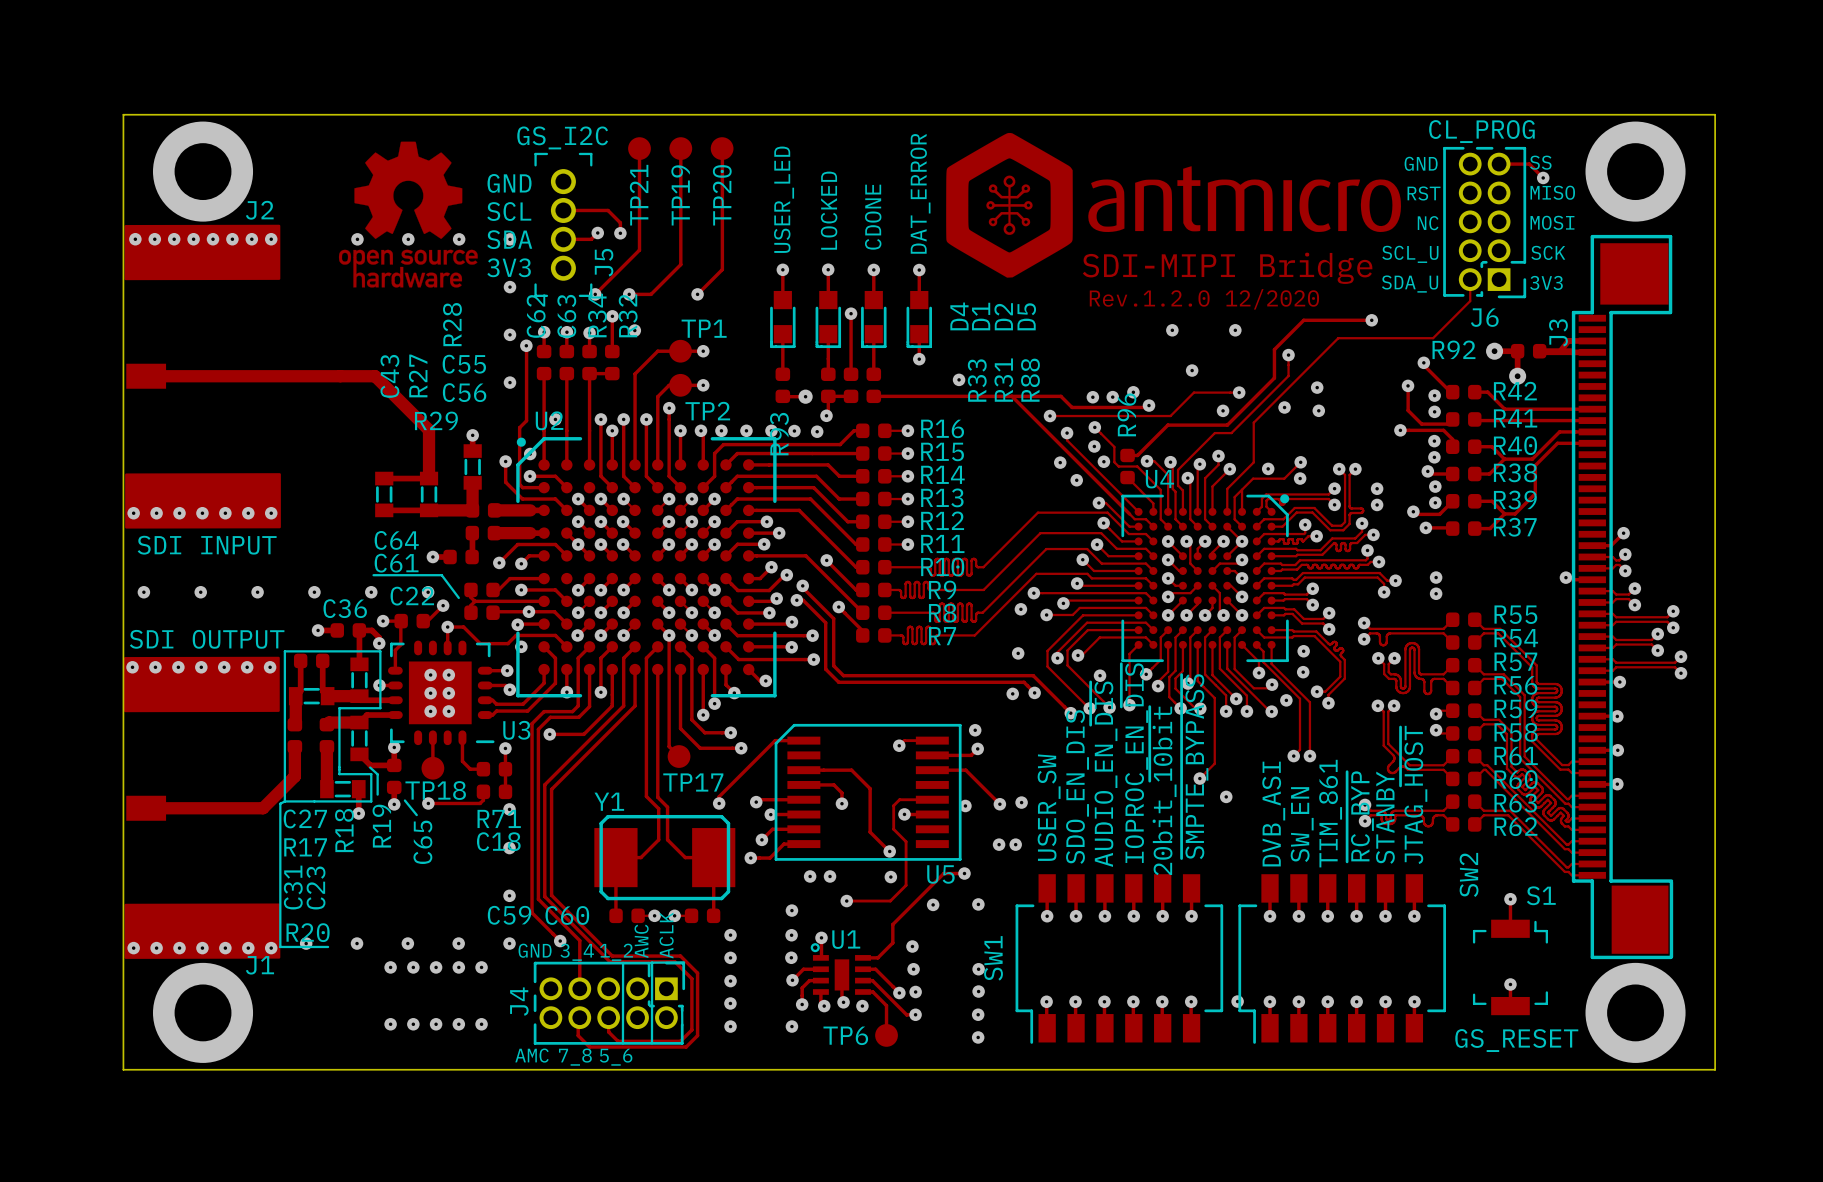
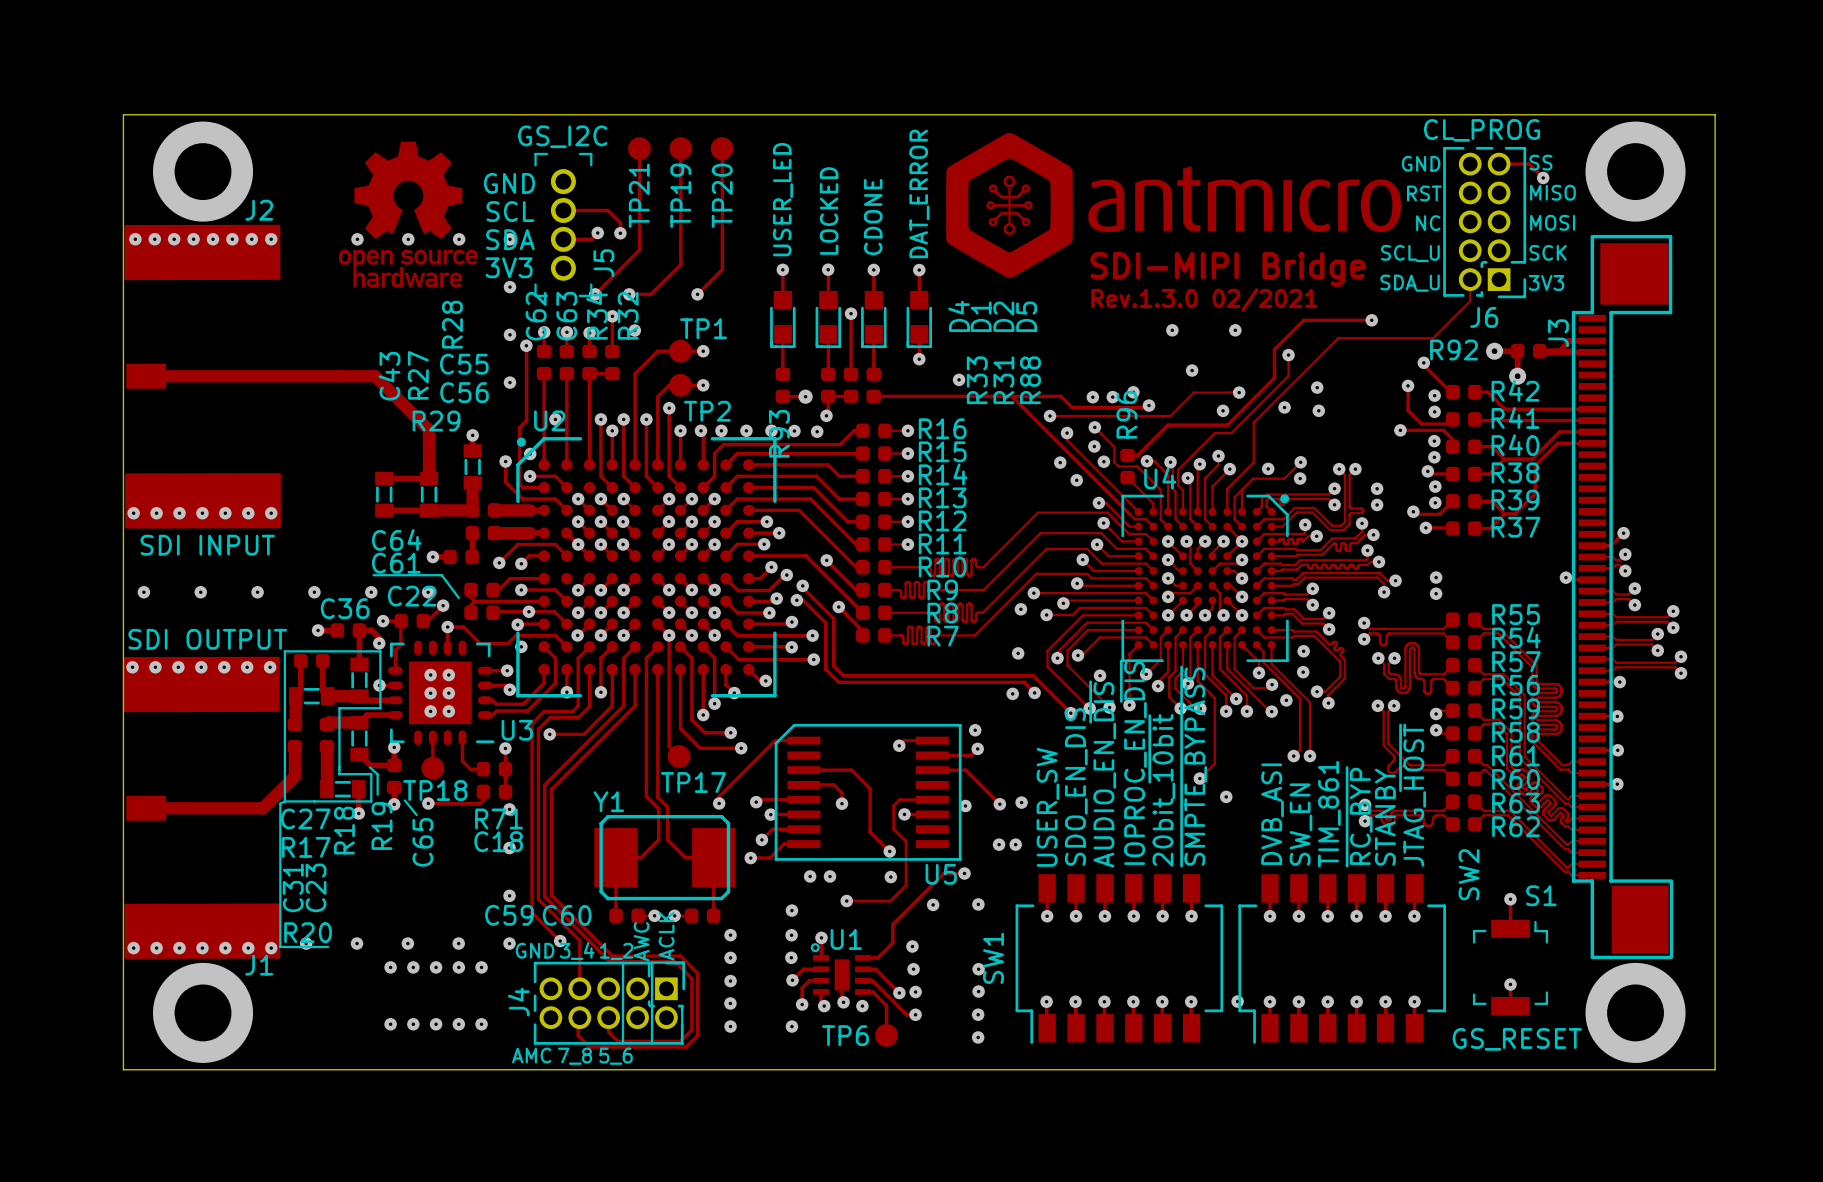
text: Rev.1.2.0 12/2020 (1204, 299) -> Rev.1.3.0 02/2021 (1204, 300)

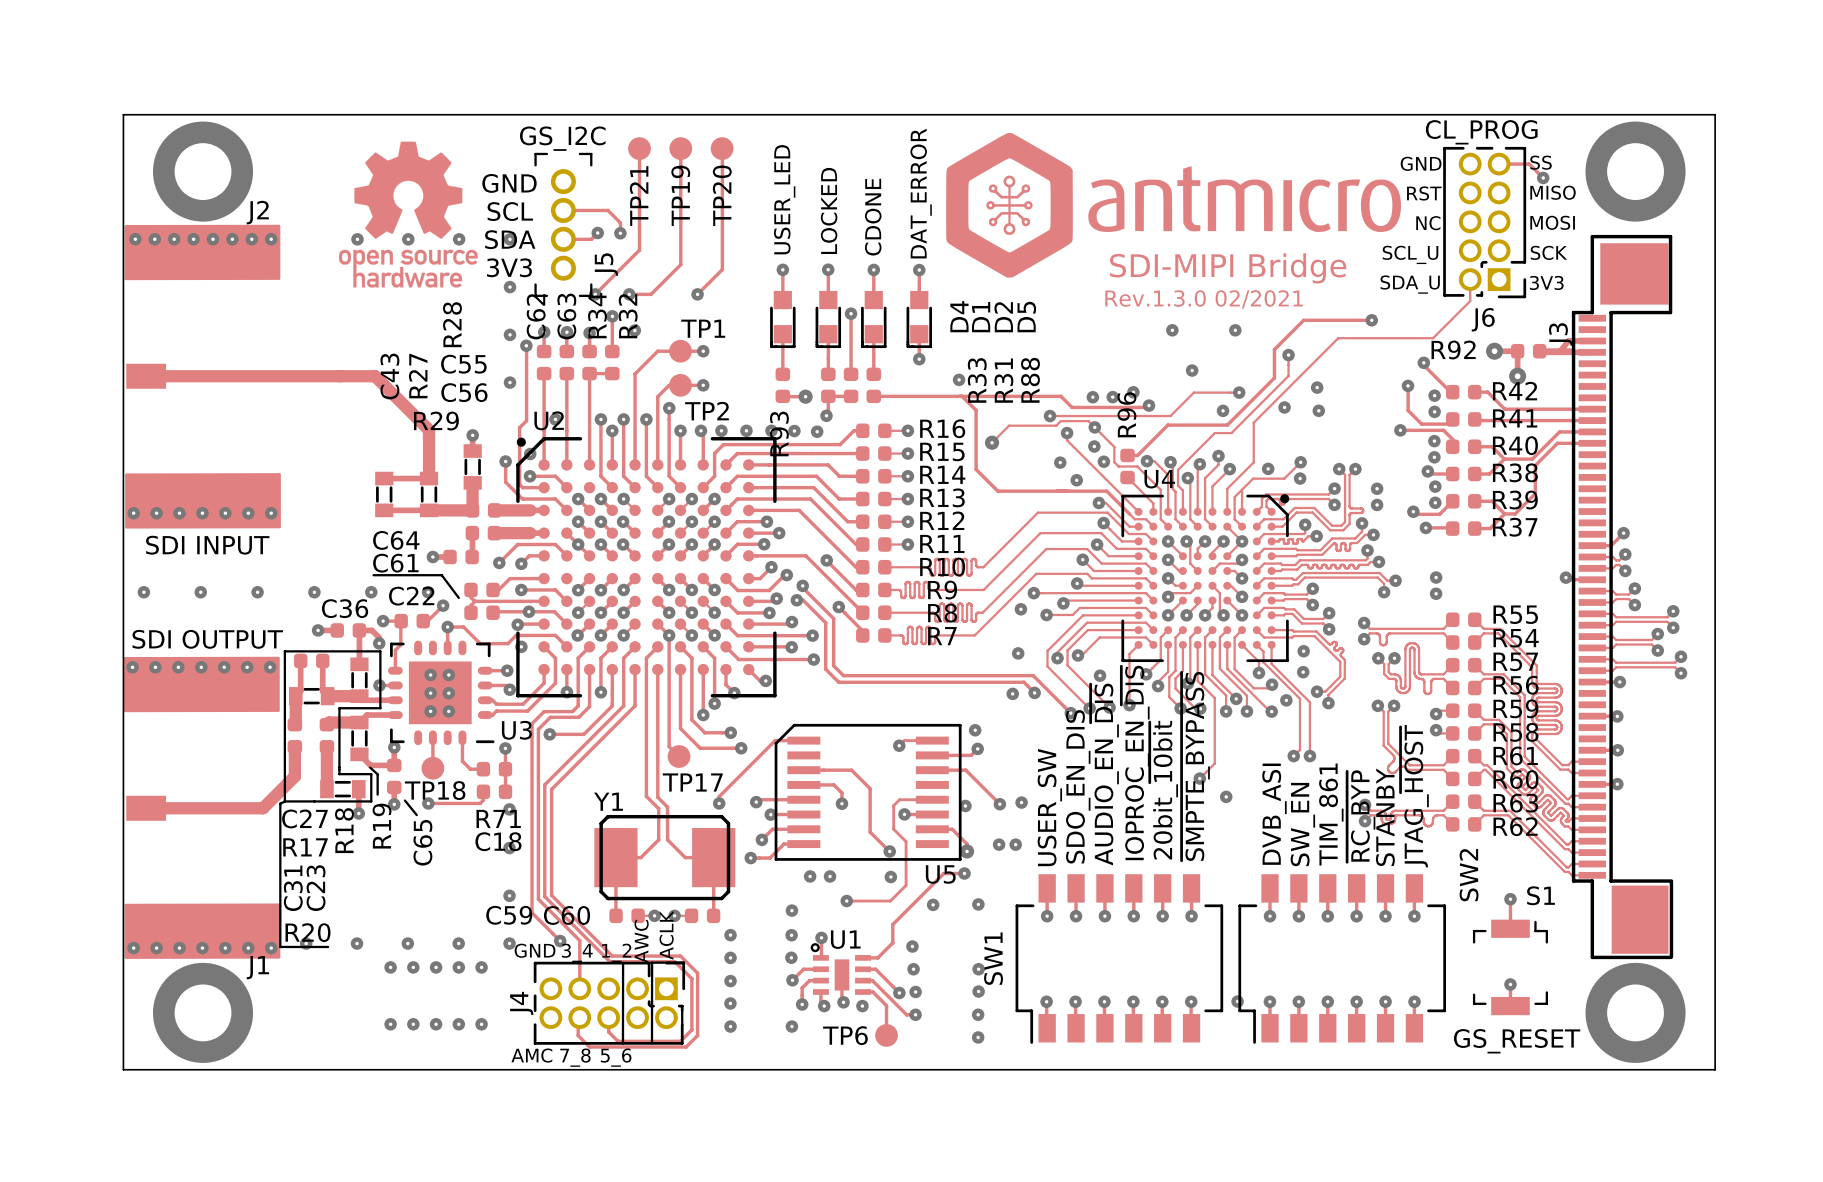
track: (1011, 396) (1106, 491) -> (962, 396) (976, 410) (976, 469) (997, 491) (1106, 491)
track: none -> (1094, 427) (1088, 421) (1060, 421) (1056, 425) (1009, 425) (992, 442)
via: none -> (992, 442)
track: none -> (932, 829) (952, 829) (967, 844) (967, 851)
via: none -> (967, 851)

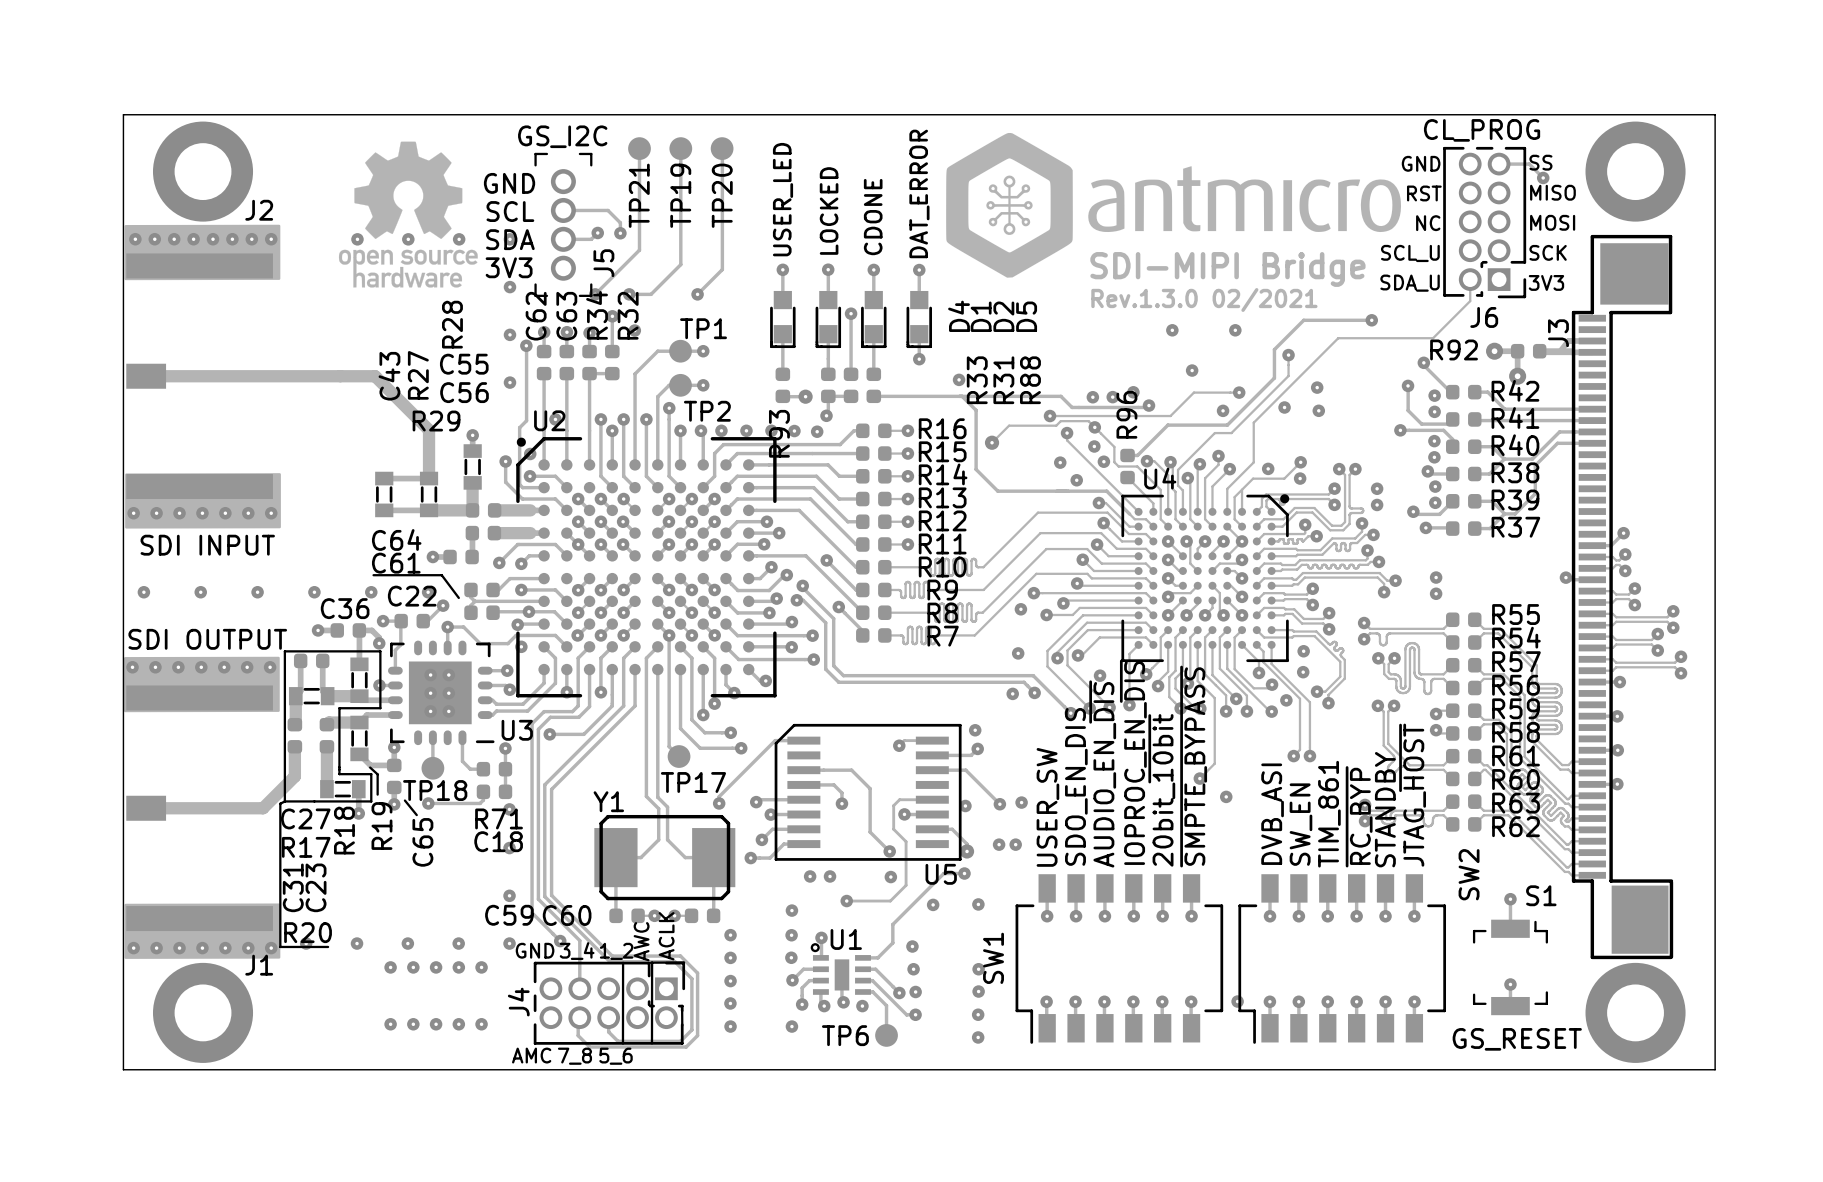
text: STANBY (1385, 817) -> STANDBY (1385, 809)

